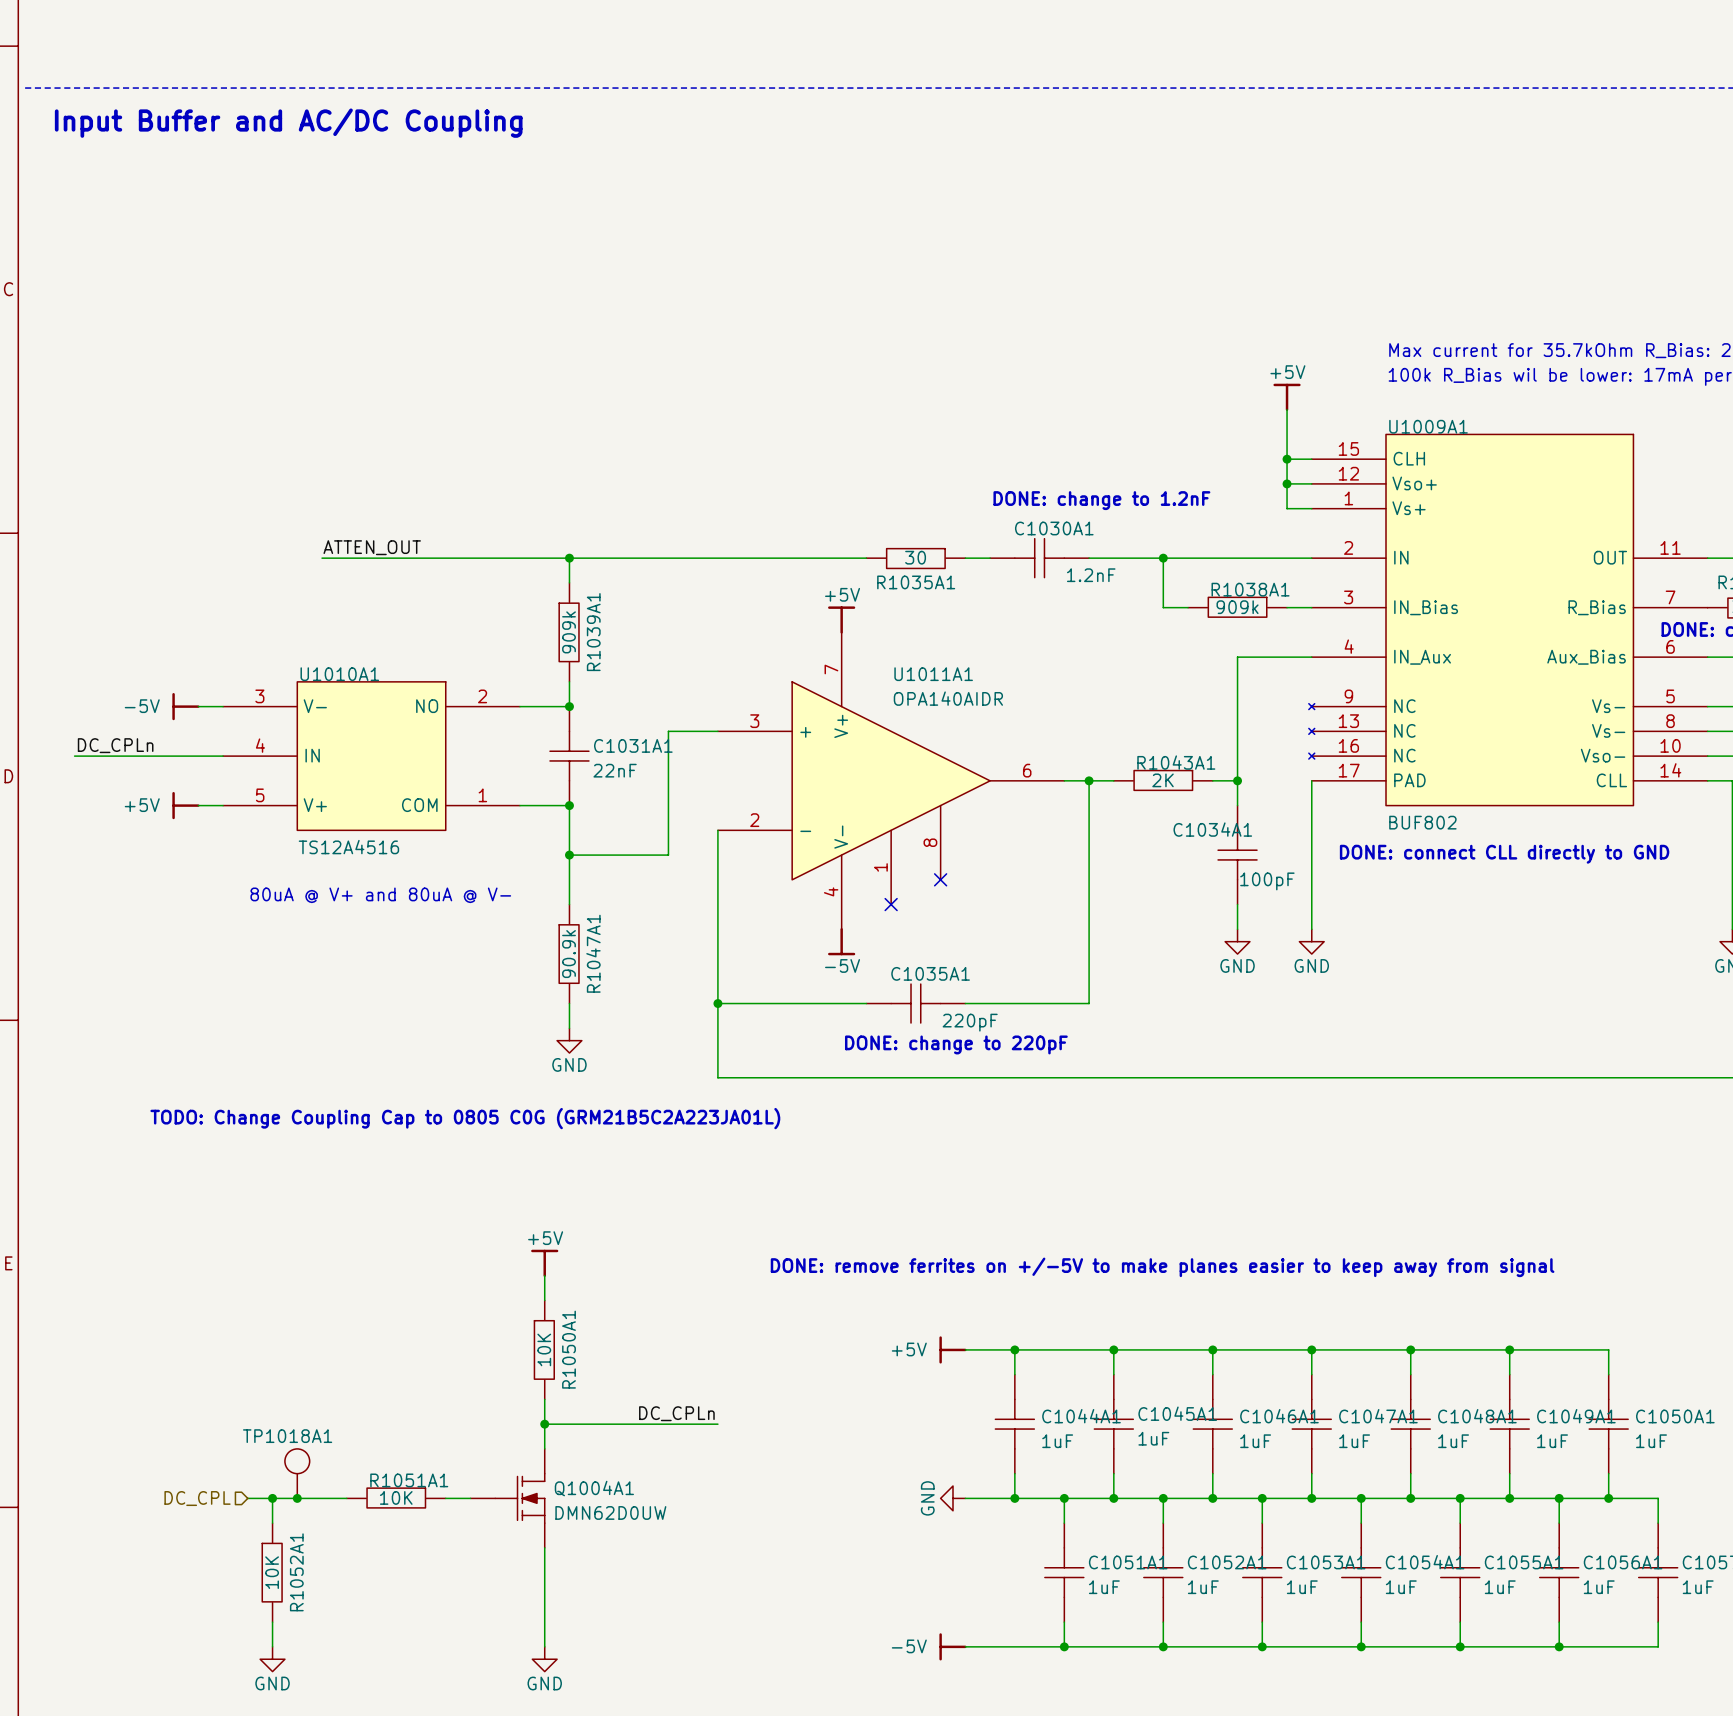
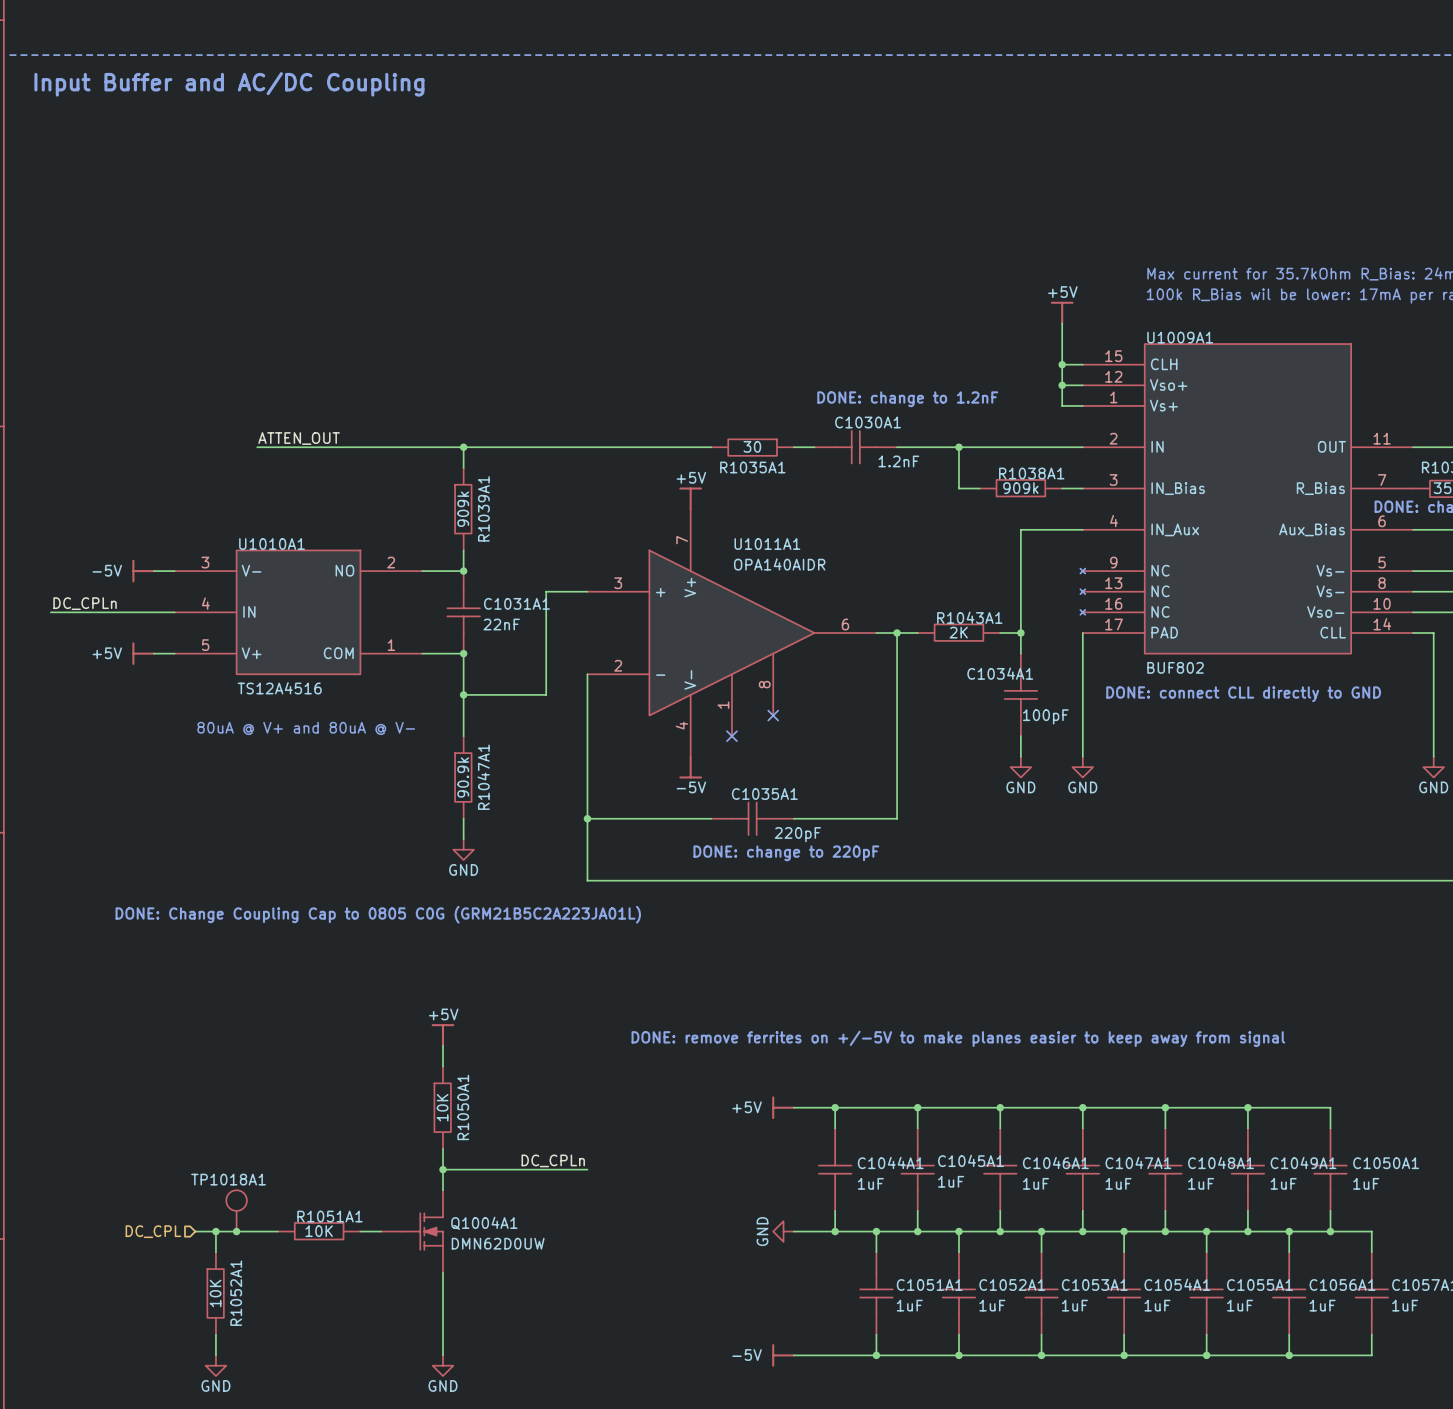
text: TODO: Change Coupling Cap to 0805 C0G (GRM21B5C2A223JA01L) (465, 1118) -> DONE: Change Coupling Cap to 0805 C0G (GRM21B5C2A223JA01L) (378, 914)

